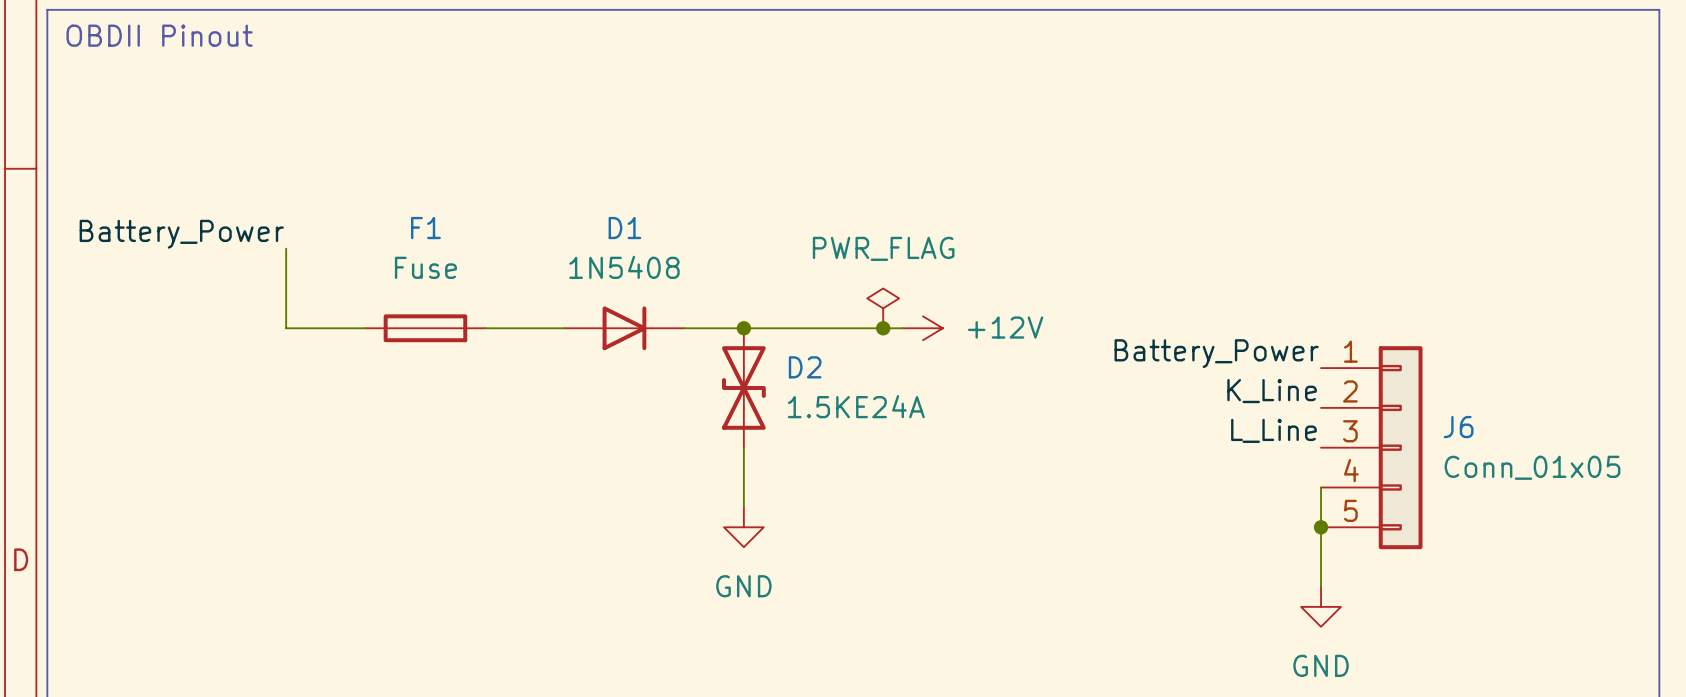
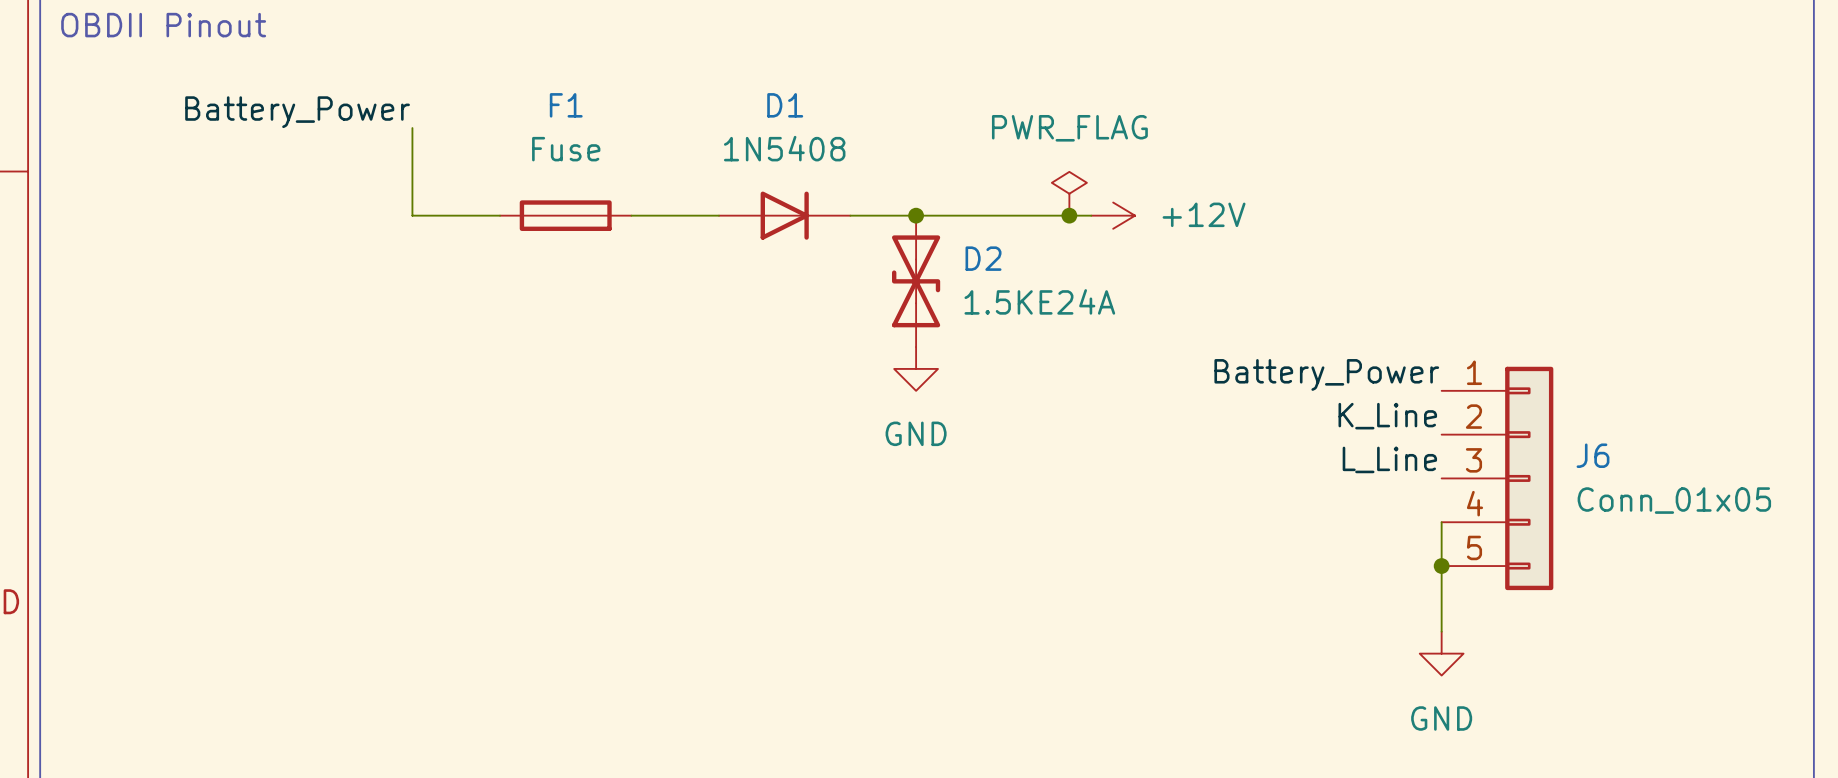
junction: none -> (916, 215)
junction: none -> (1069, 215)
label position: Battery_Power (181, 234) -> Battery_Power (297, 112)
wire: (286, 248) (286, 328) (365, 328) -> (412, 128) (412, 215) (500, 215)
power symbol position: PWR_FLAG (883, 308) -> PWR_FLAG (1069, 193)
F1 position: (425, 328) -> (565, 215)
wire: (485, 328) (564, 328) -> (631, 215) (719, 215)
D1 position: (624, 328) -> (784, 215)
wire: (684, 328) (903, 328) -> (850, 215) (1091, 215)
junction: (743, 328) -> none
junction: (883, 328) -> none
power symbol position: +12V (923, 328) -> +12V (1113, 215)
D2 position: (743, 387) -> (916, 281)
wire: (743, 447) (743, 507) -> none
power symbol position: GND (743, 527) -> GND (916, 368)

